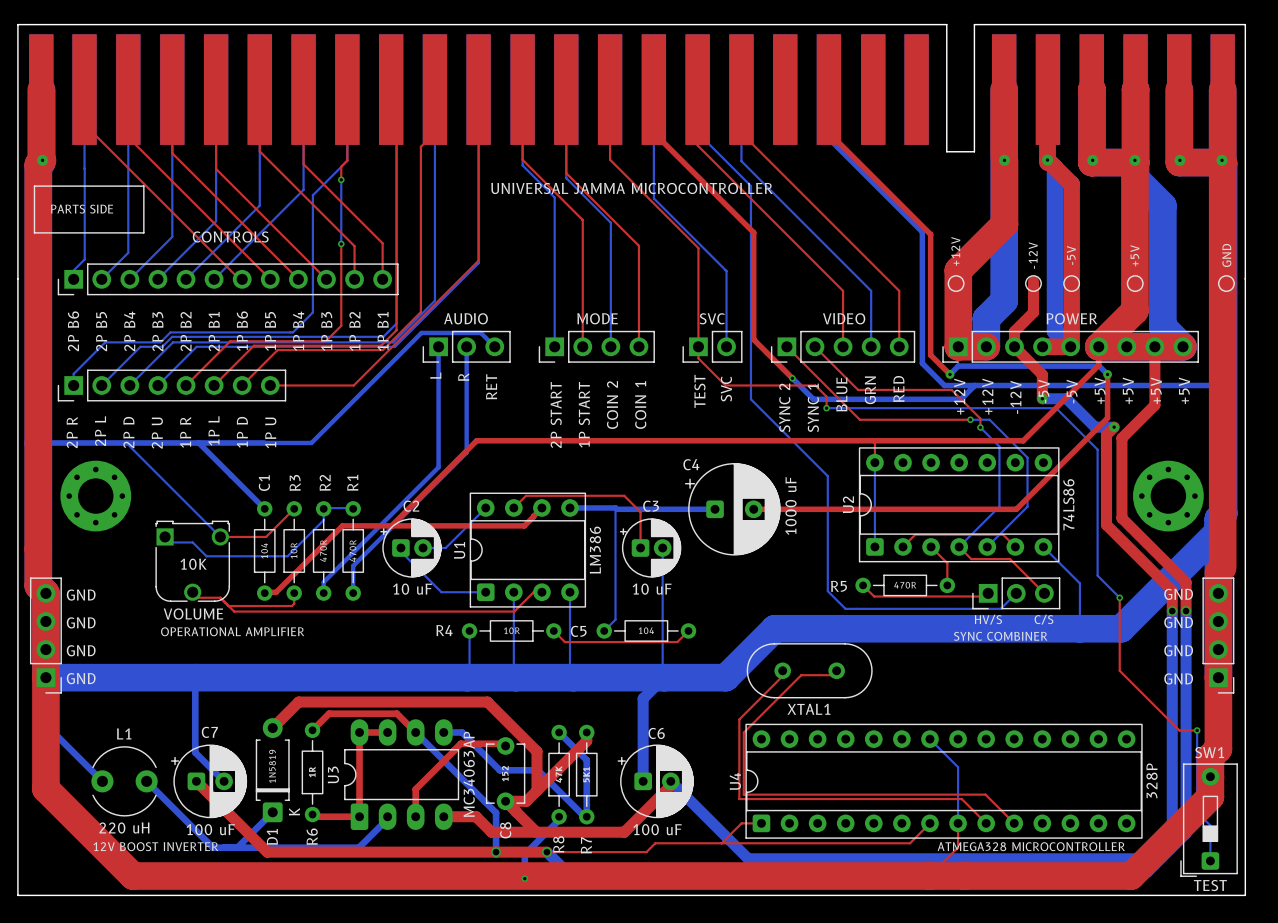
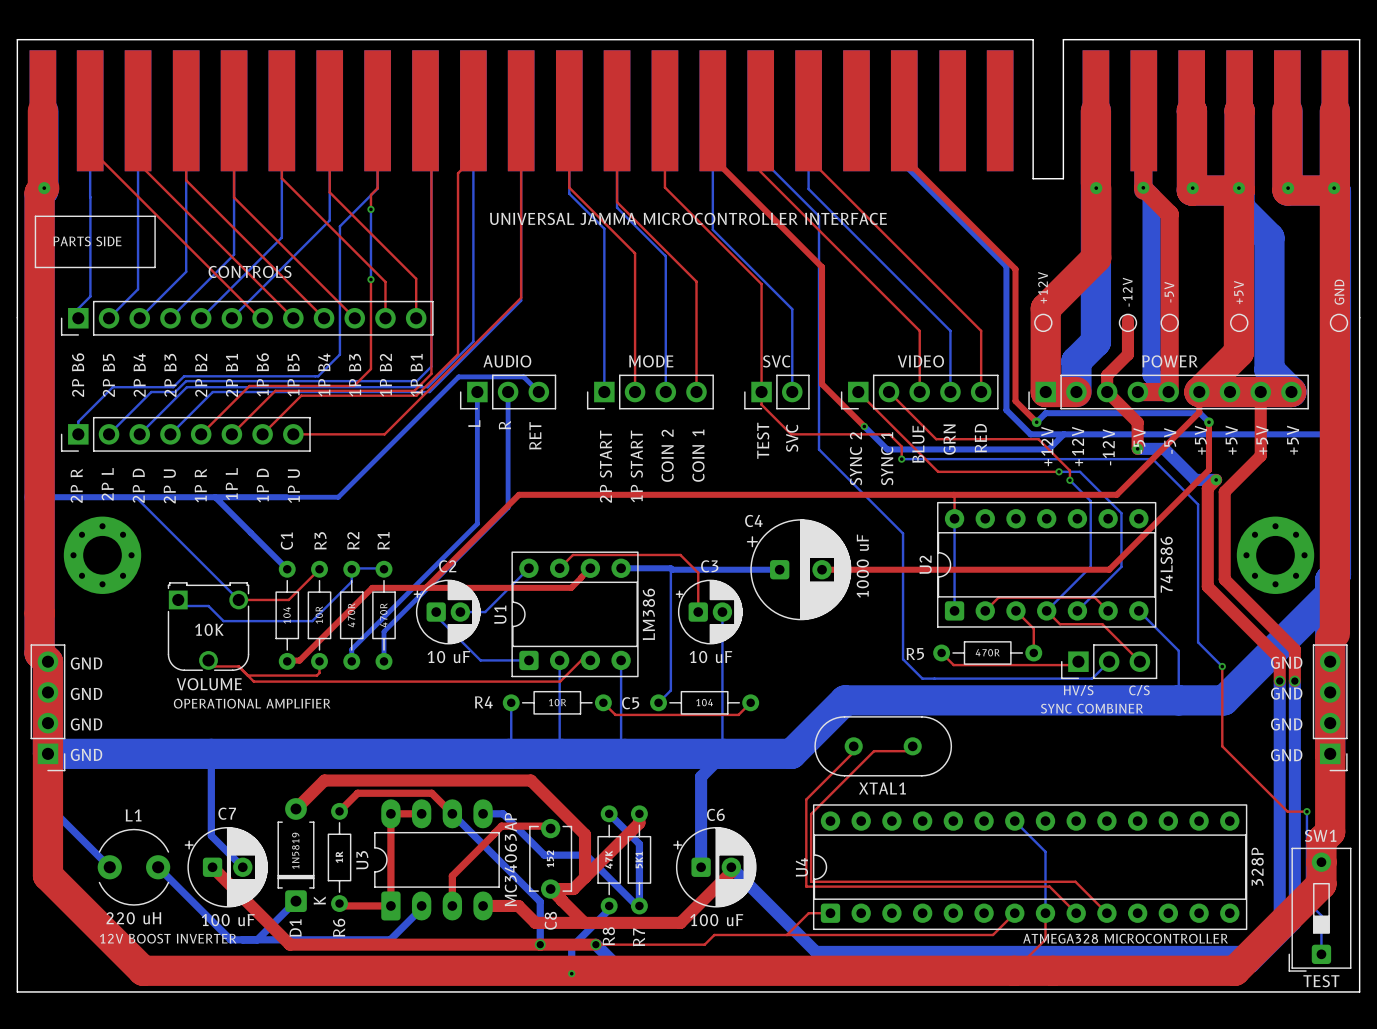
text: UNIVERSAL JAMMA MICROCONTROLLER (631, 188) -> UNIVERSAL JAMMA MICROCONTROLLER INTERFACE (688, 218)

